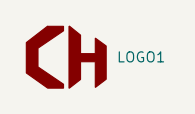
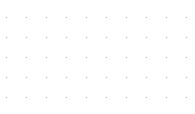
LOGO1: (66, 57) -> none

